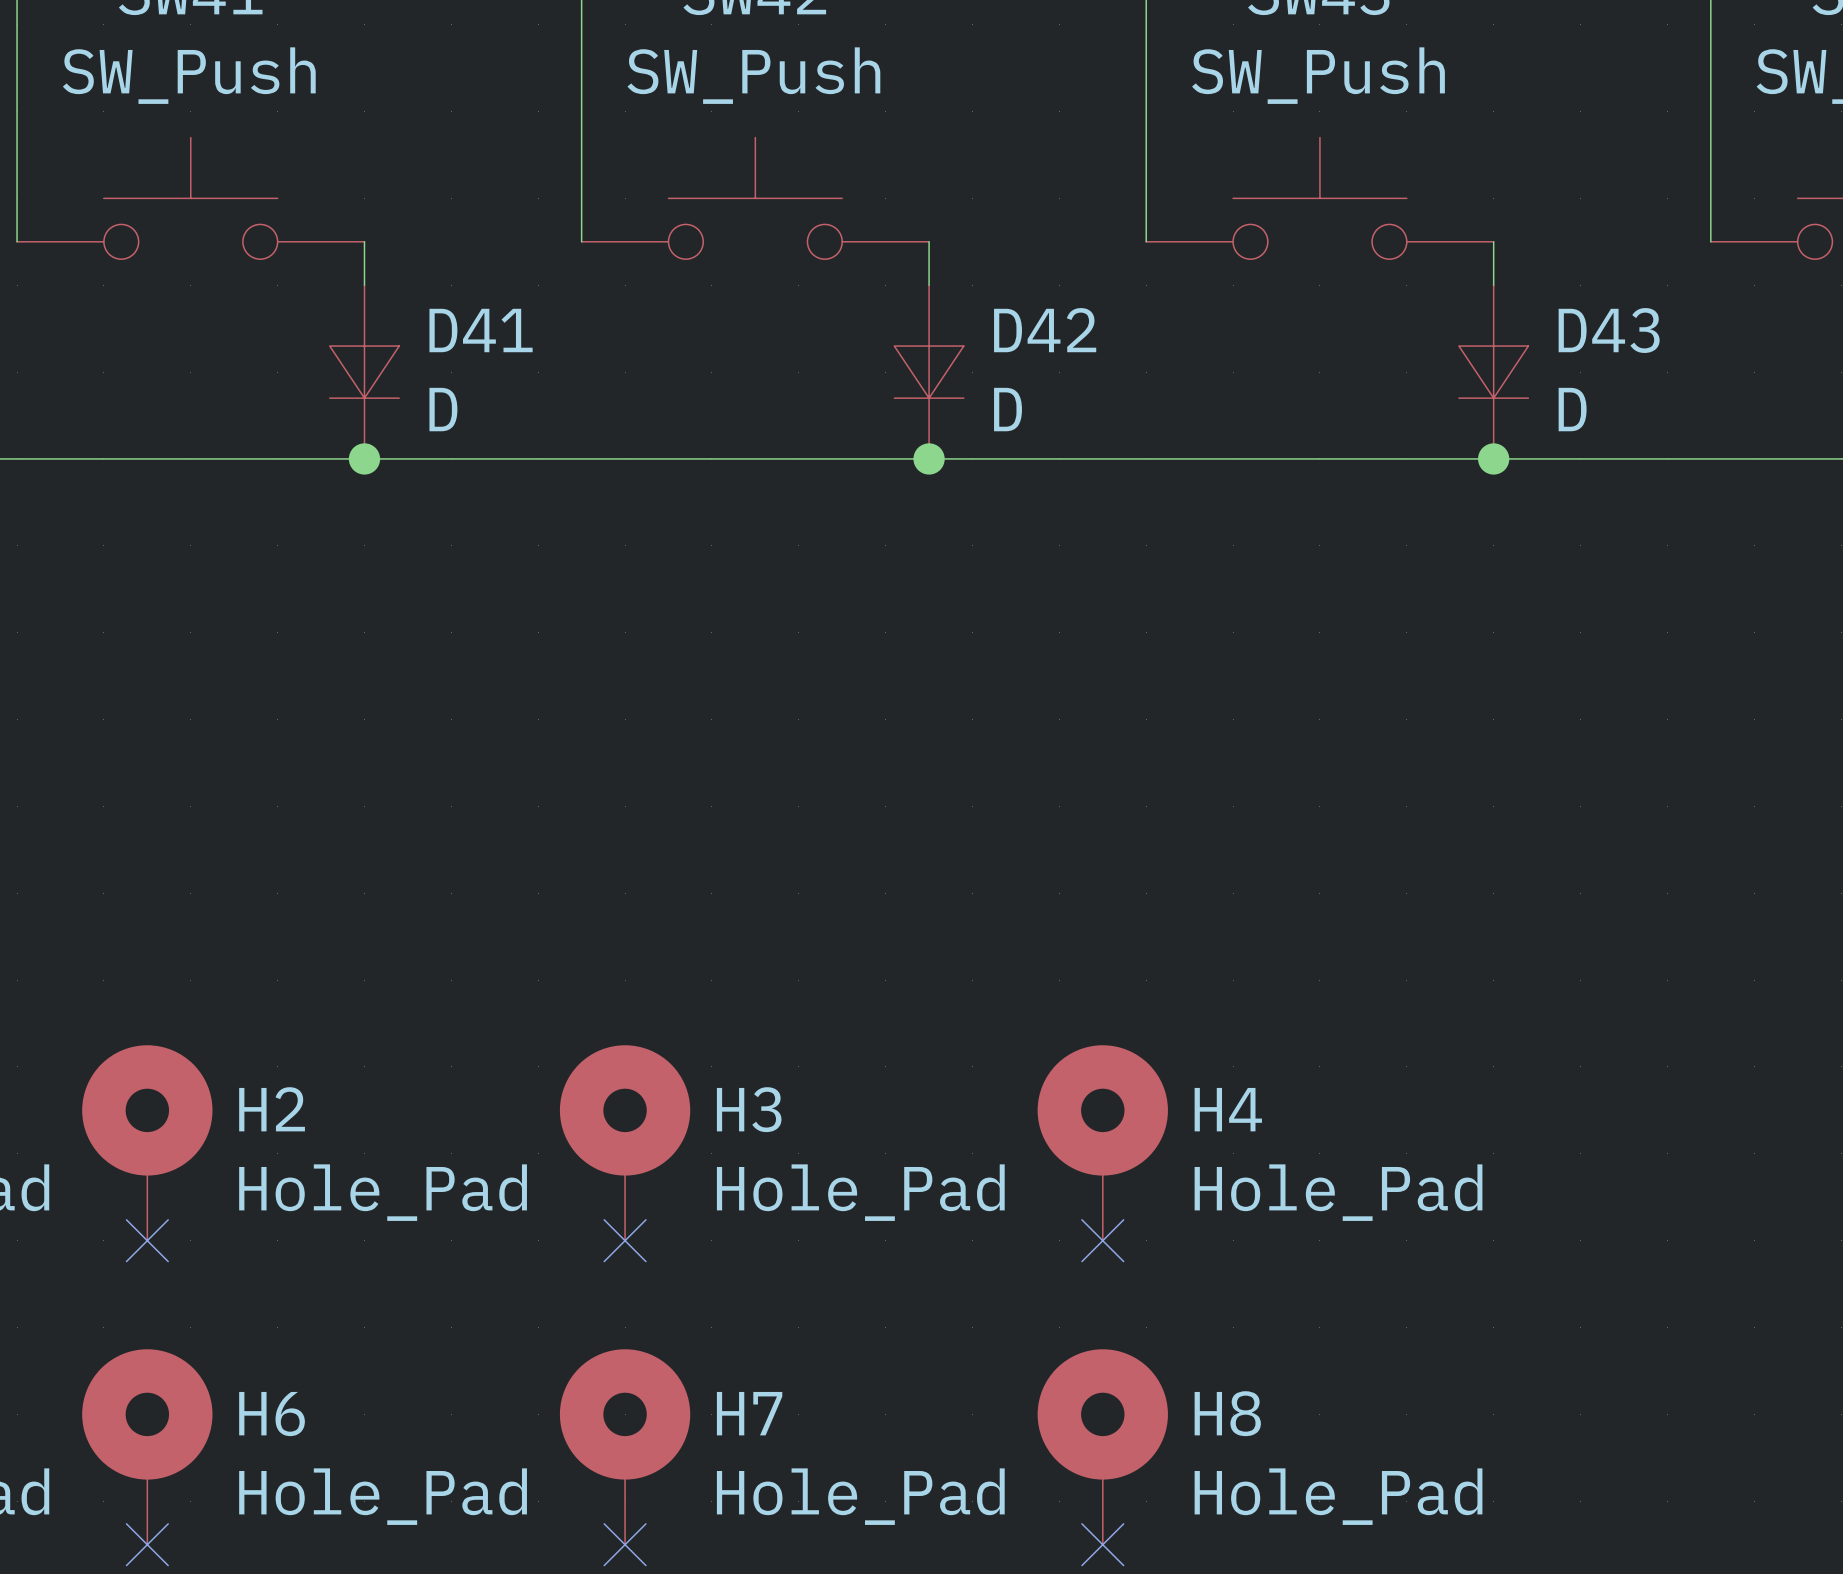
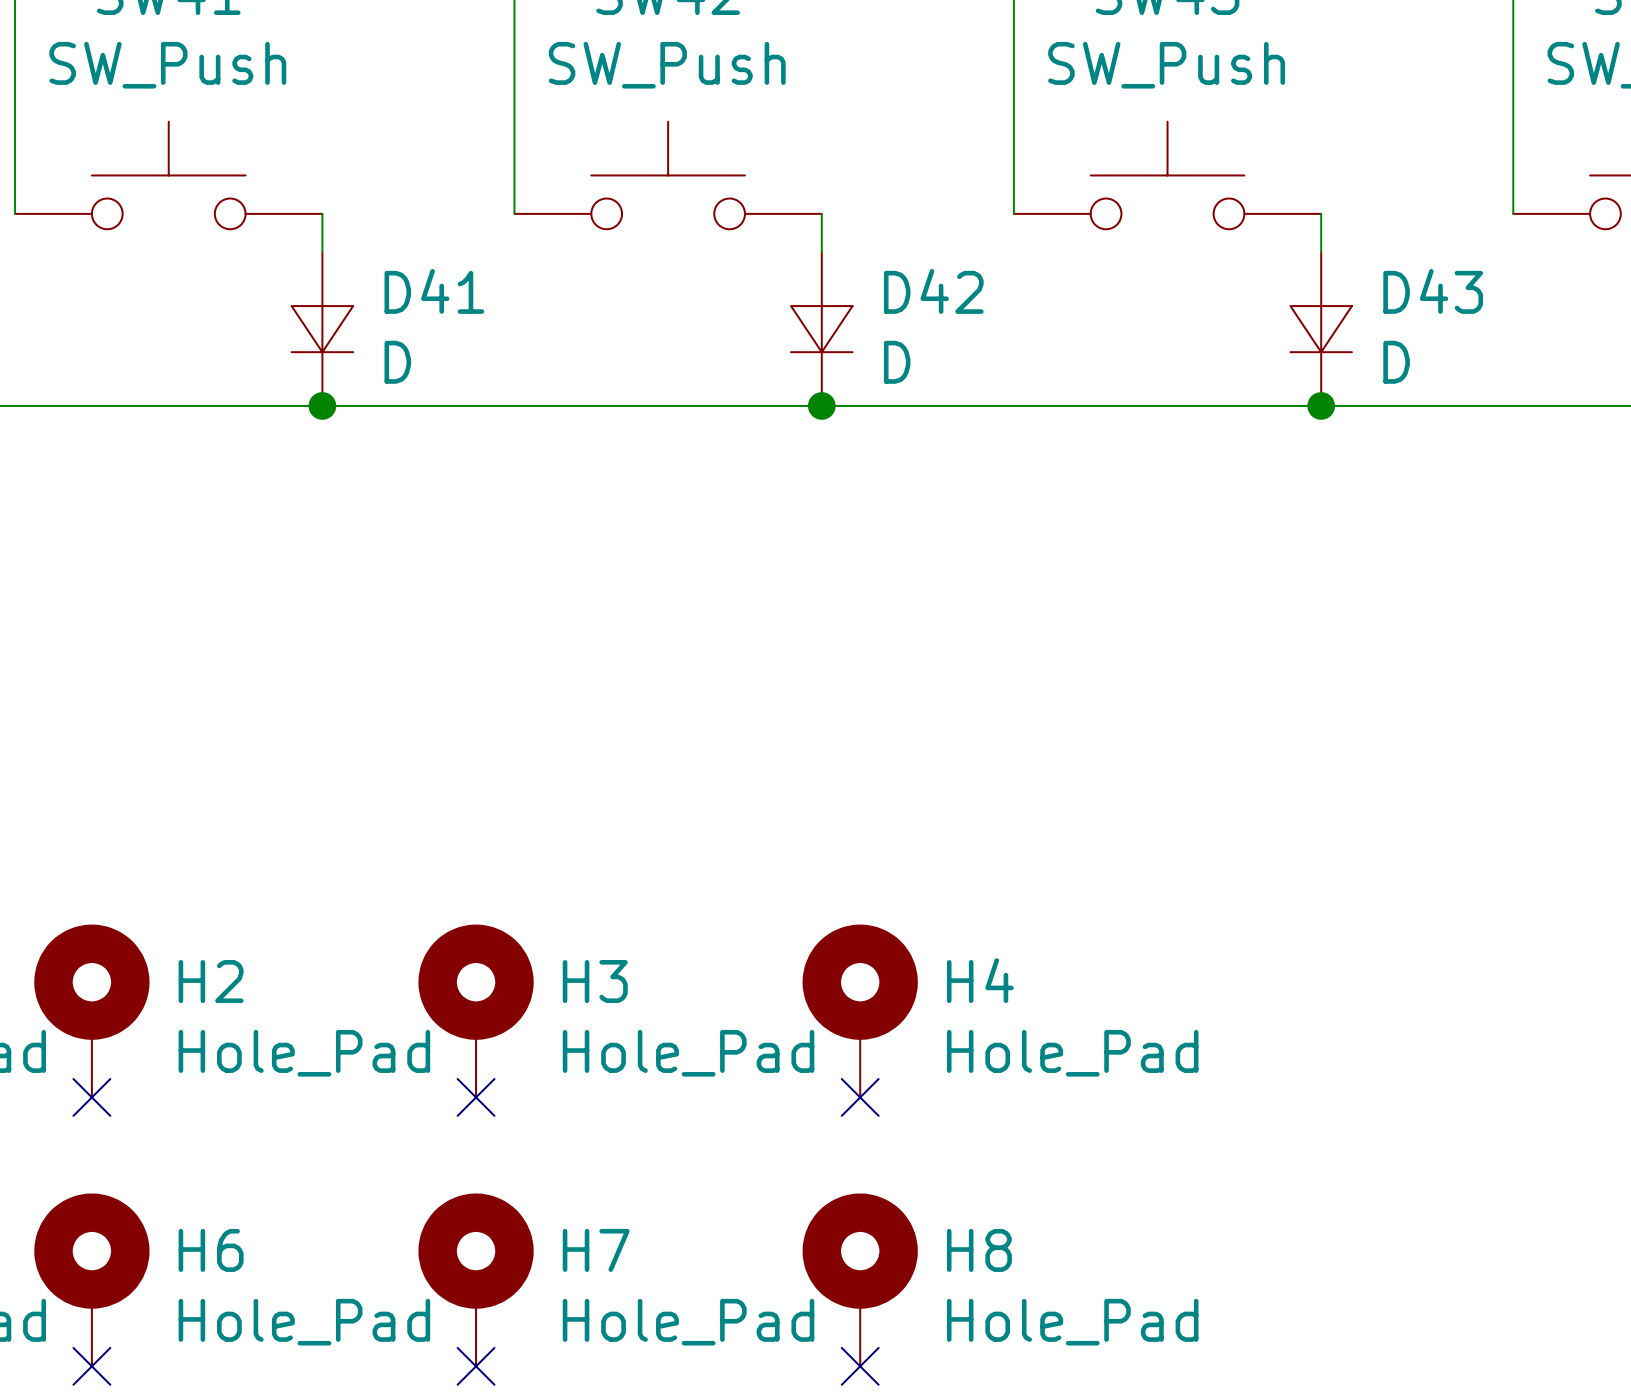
H2 position: (147, 1142) -> (91, 1011)
H3 position: (625, 1142) -> (476, 1011)
H4 position: (1102, 1142) -> (860, 1011)
no-connect mark position: (147, 1240) -> (91, 1097)
no-connect mark position: (625, 1240) -> (476, 1097)
no-connect mark position: (1102, 1240) -> (860, 1097)
H6 position: (147, 1446) -> (91, 1279)
H7 position: (625, 1446) -> (476, 1279)
H8 position: (1102, 1446) -> (860, 1279)
no-connect mark position: (147, 1544) -> (91, 1366)
no-connect mark position: (625, 1544) -> (476, 1366)
no-connect mark position: (1102, 1544) -> (860, 1366)

